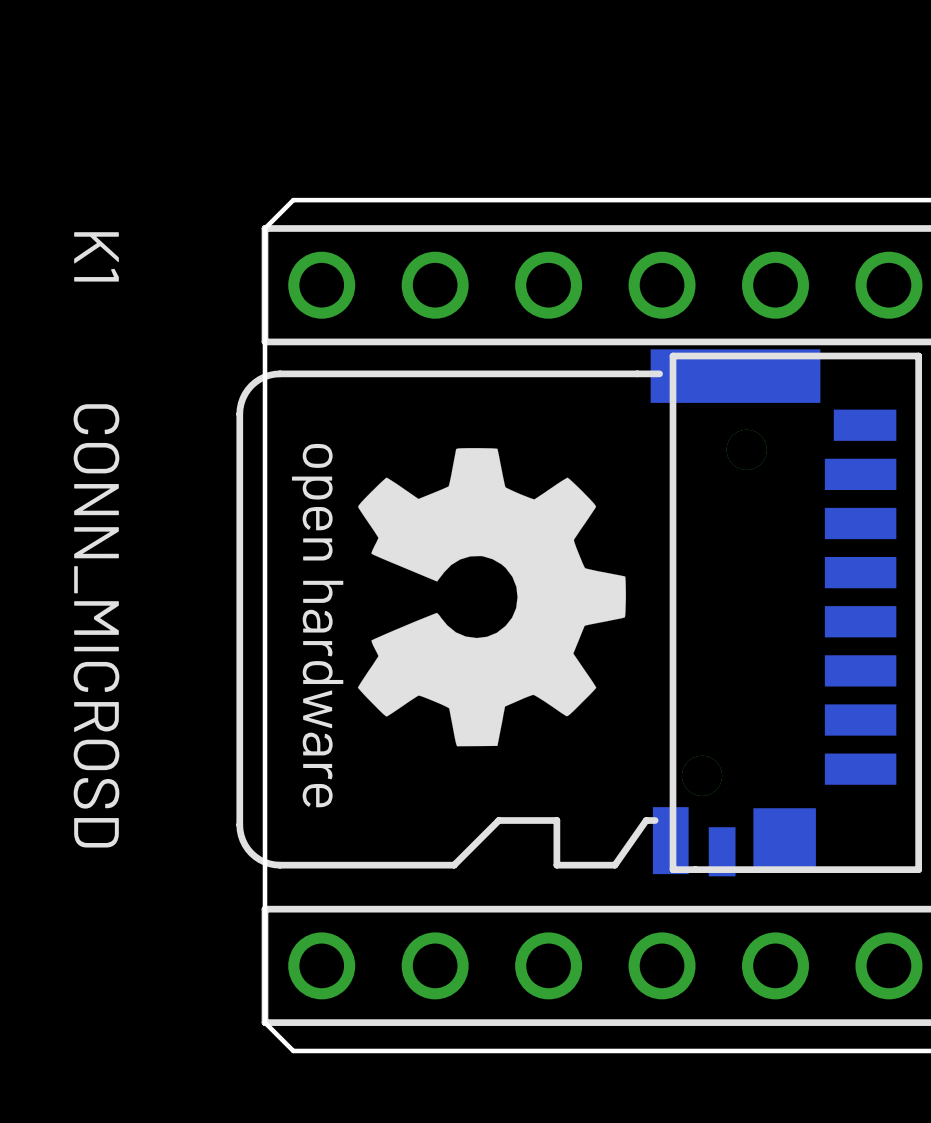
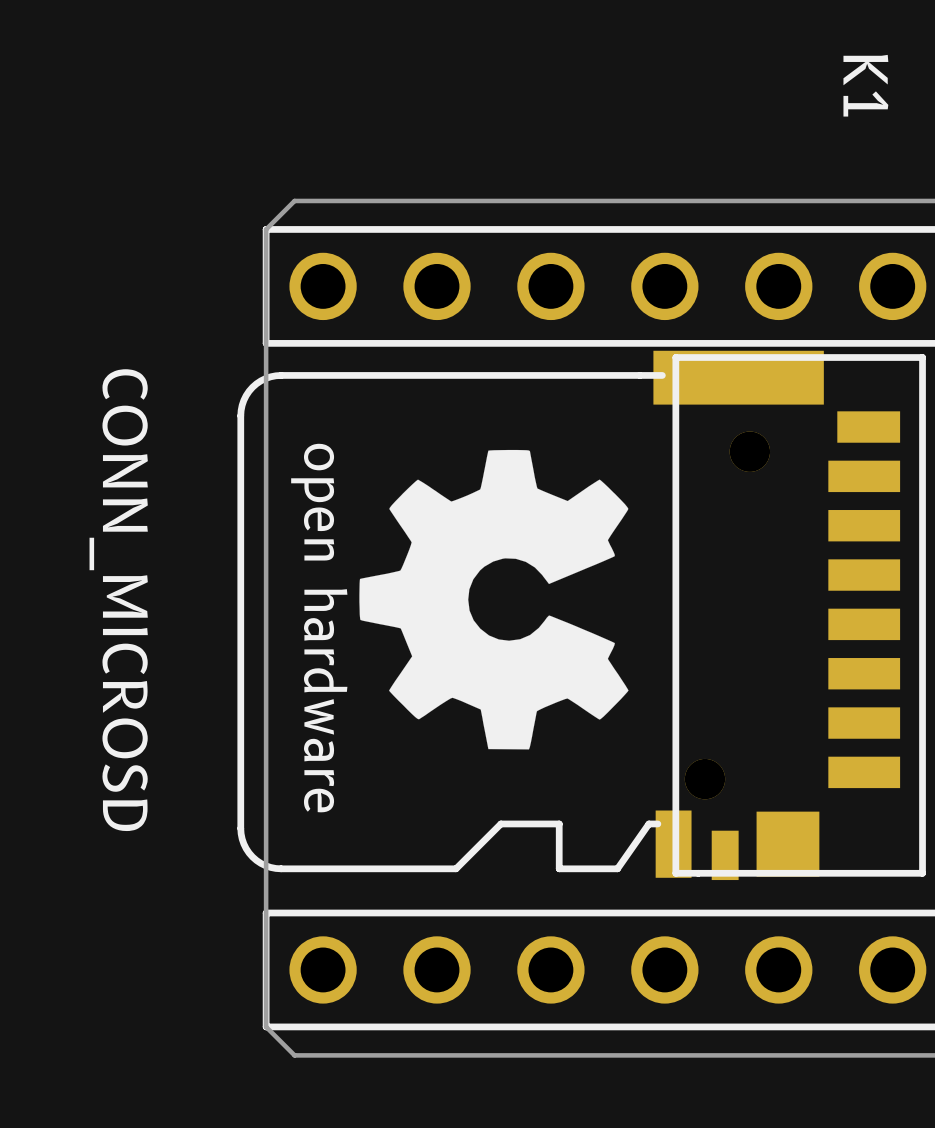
K1 name position: K1 (96, 256) -> K1 (865, 85)
drawing shape: [357, 448, 626, 747] -> [359, 449, 629, 750]
K1 value position: CONN_MICROSD (96, 625) -> CONN_MICROSD (118, 600)

